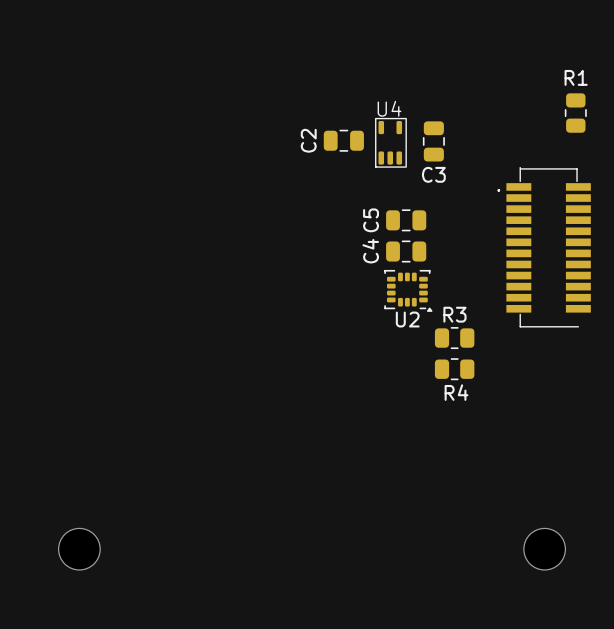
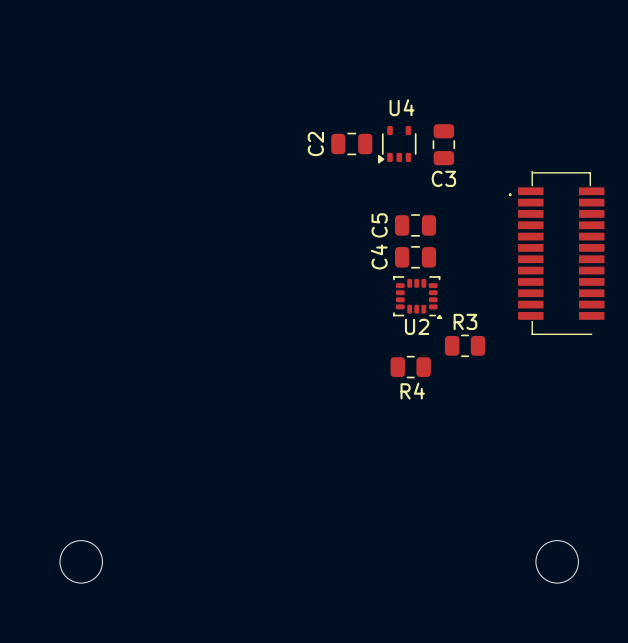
R1: (575, 113) -> none
U4 footprint: [375, 117, 407, 168] -> [378, 125, 417, 164]
R4 position: (454, 369) -> (410, 367)

